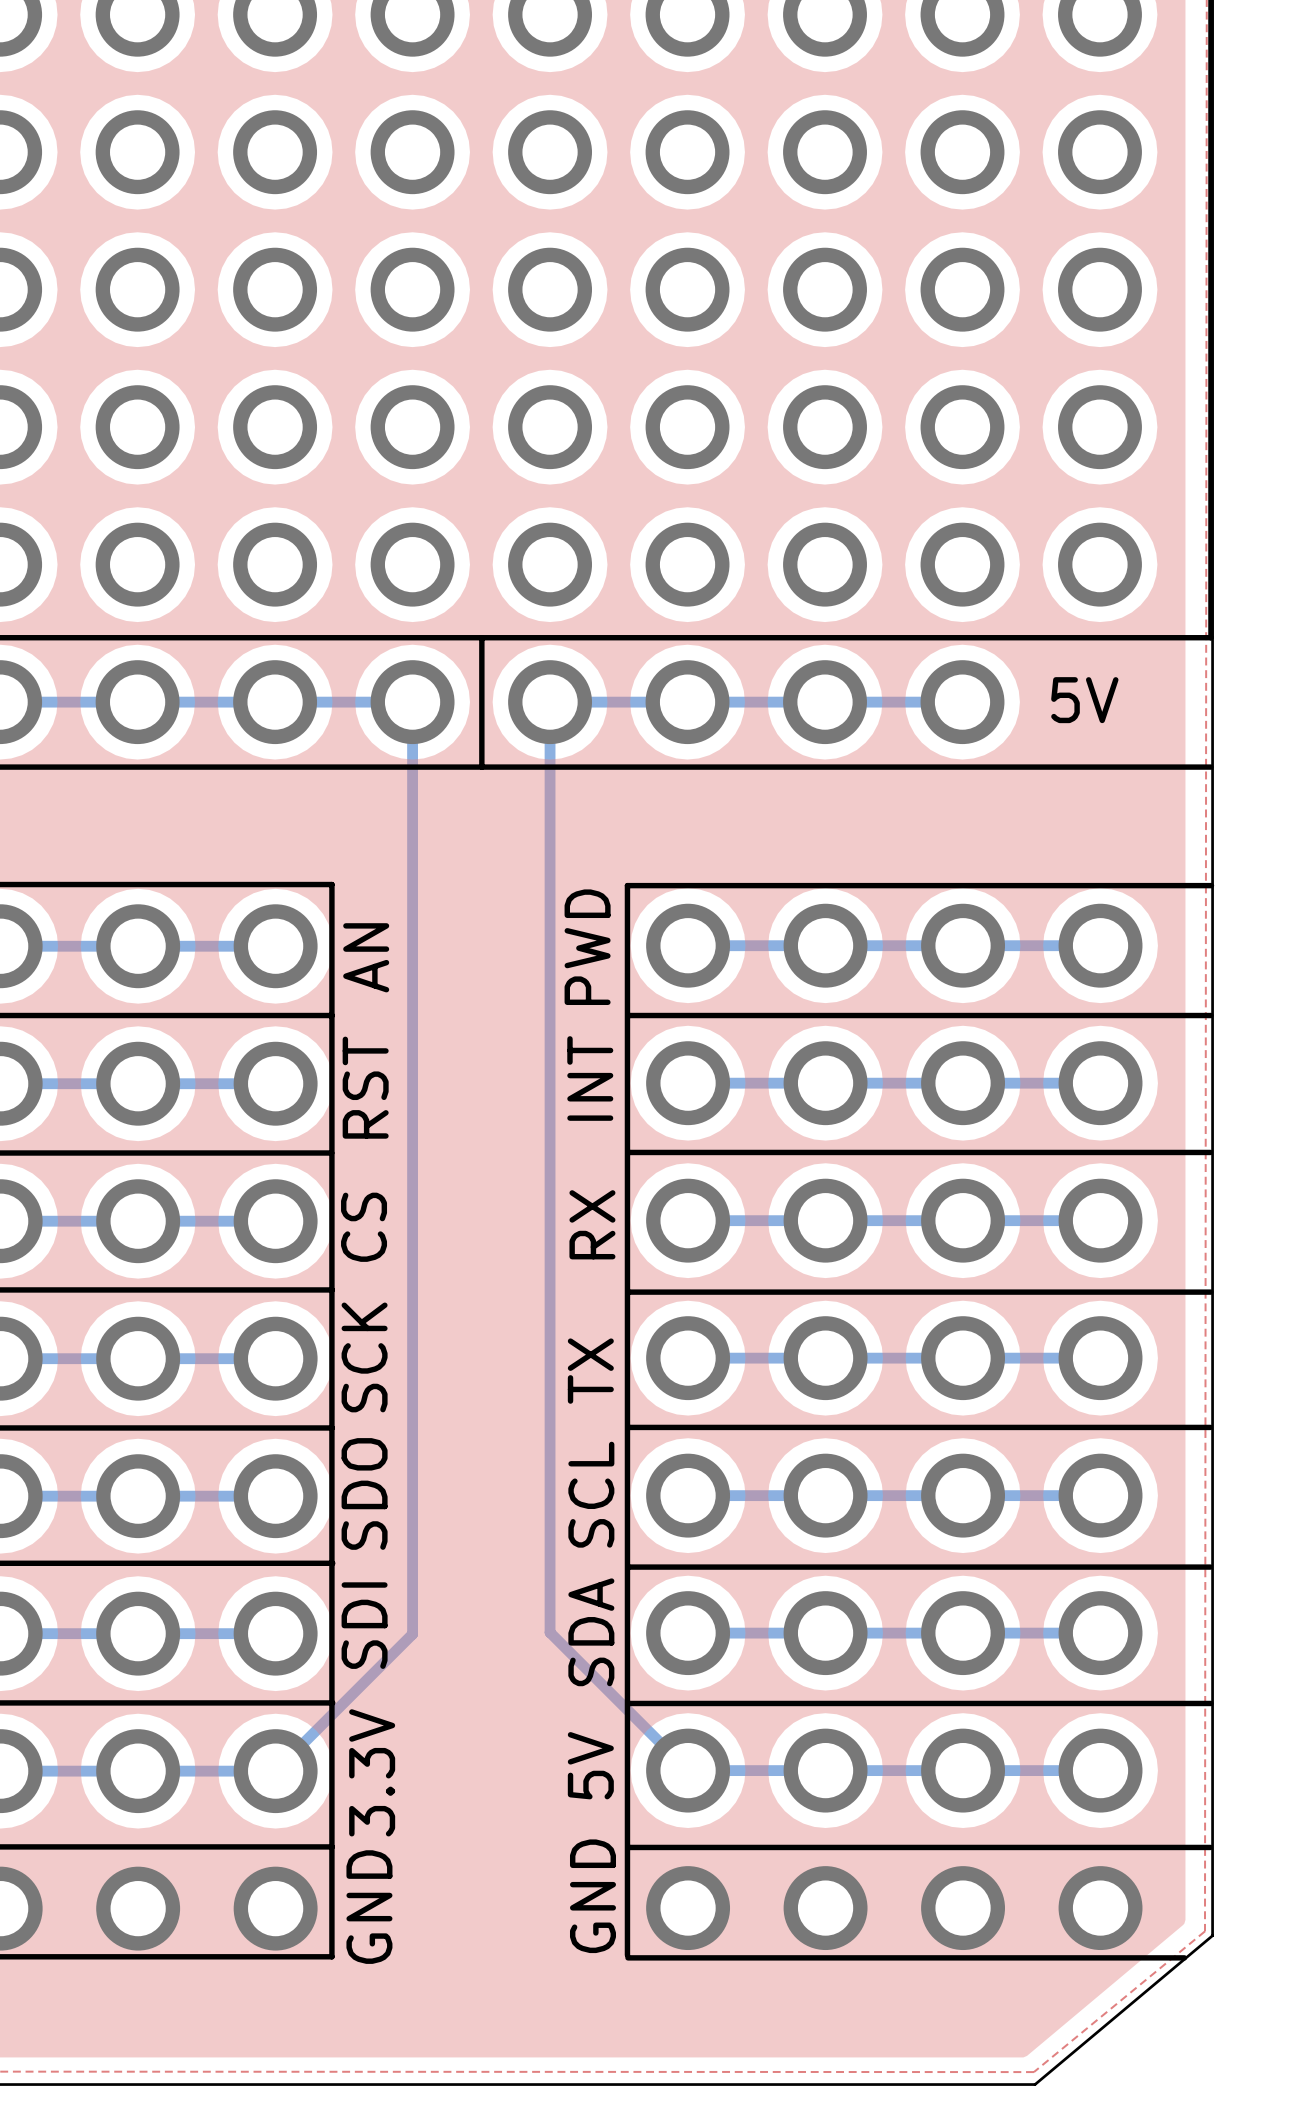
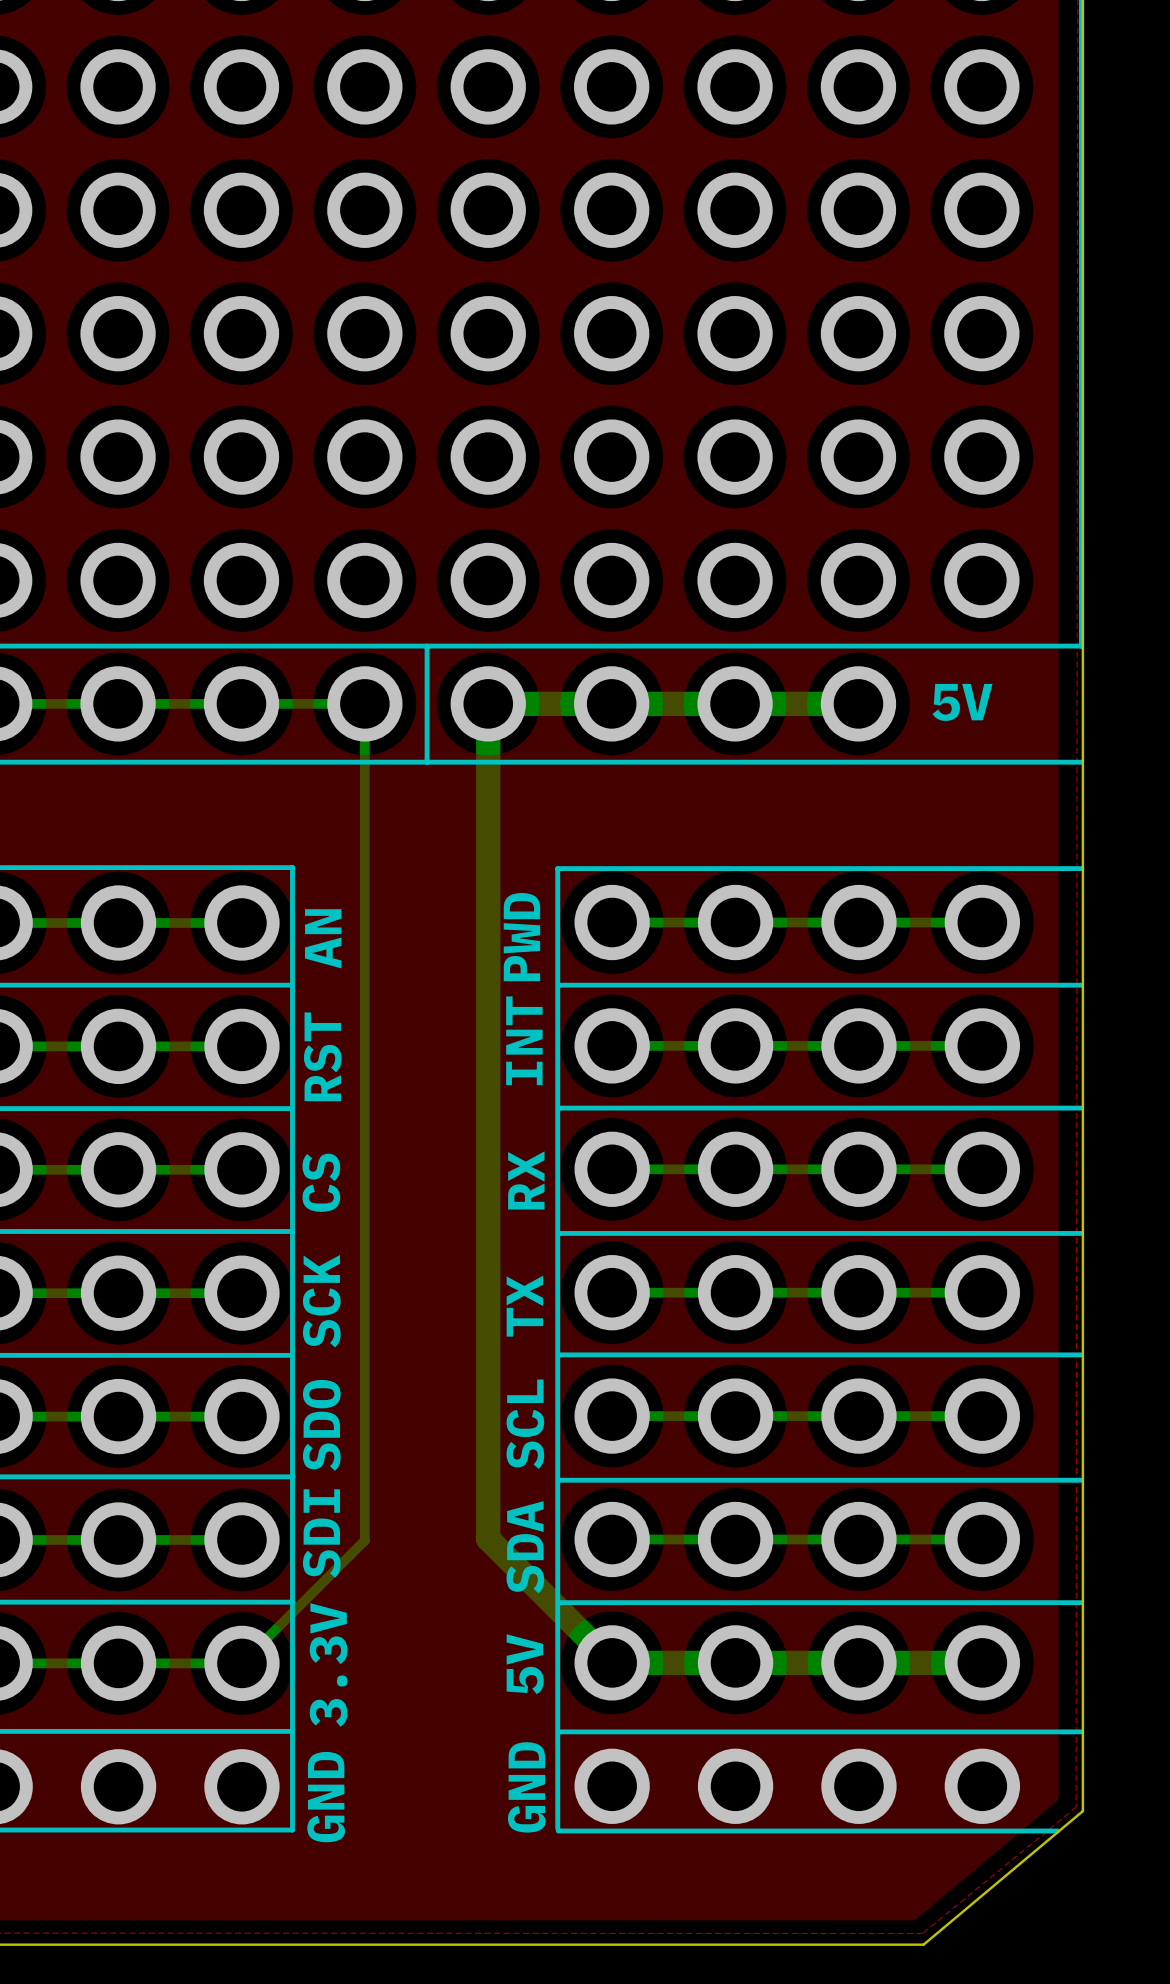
bottom track width: thin (962, 702) (550, 702) (550, 1632) (688, 1770) (1100, 1770) -> thick (858, 703) (488, 703) (488, 1539) (612, 1662) (982, 1662)

